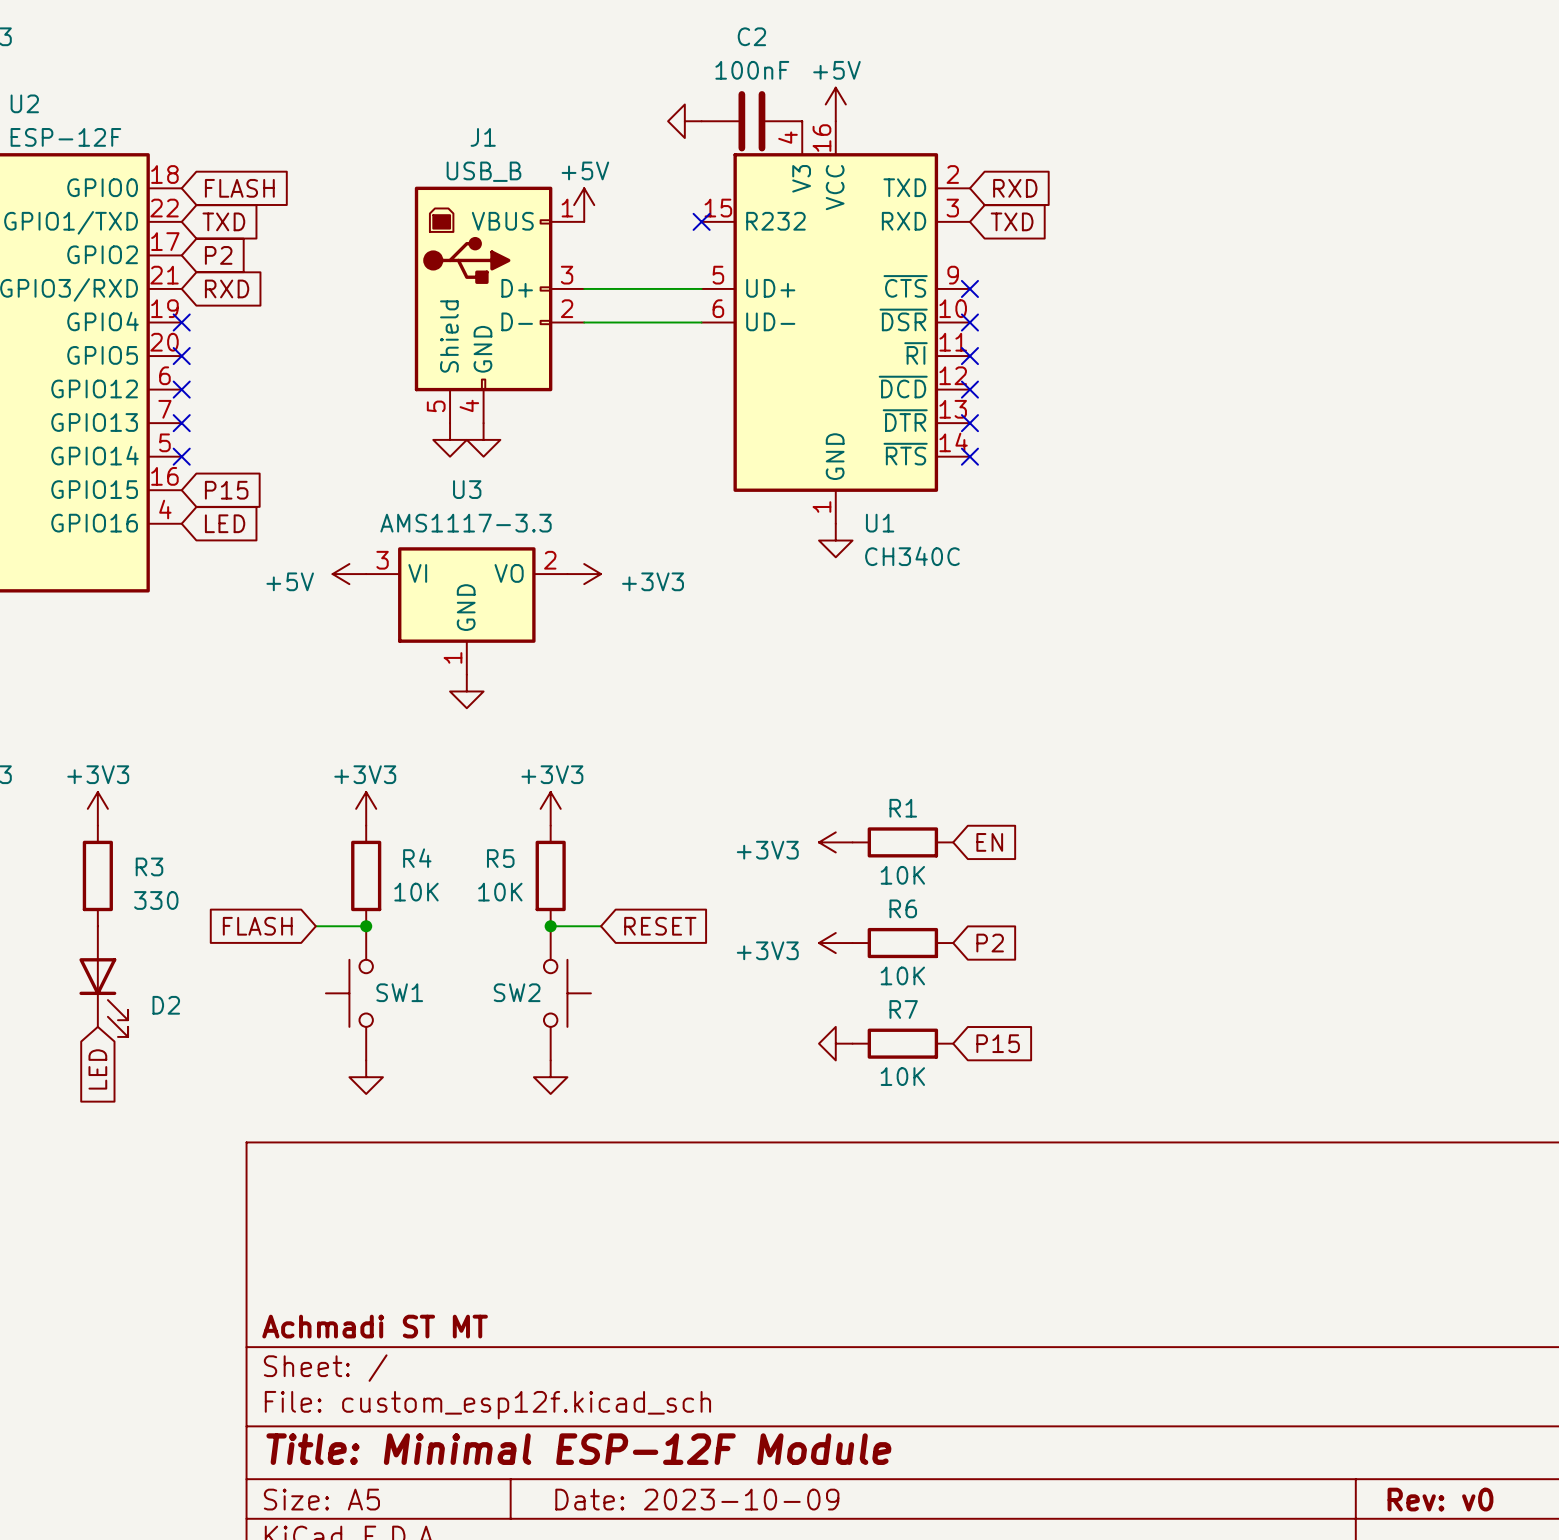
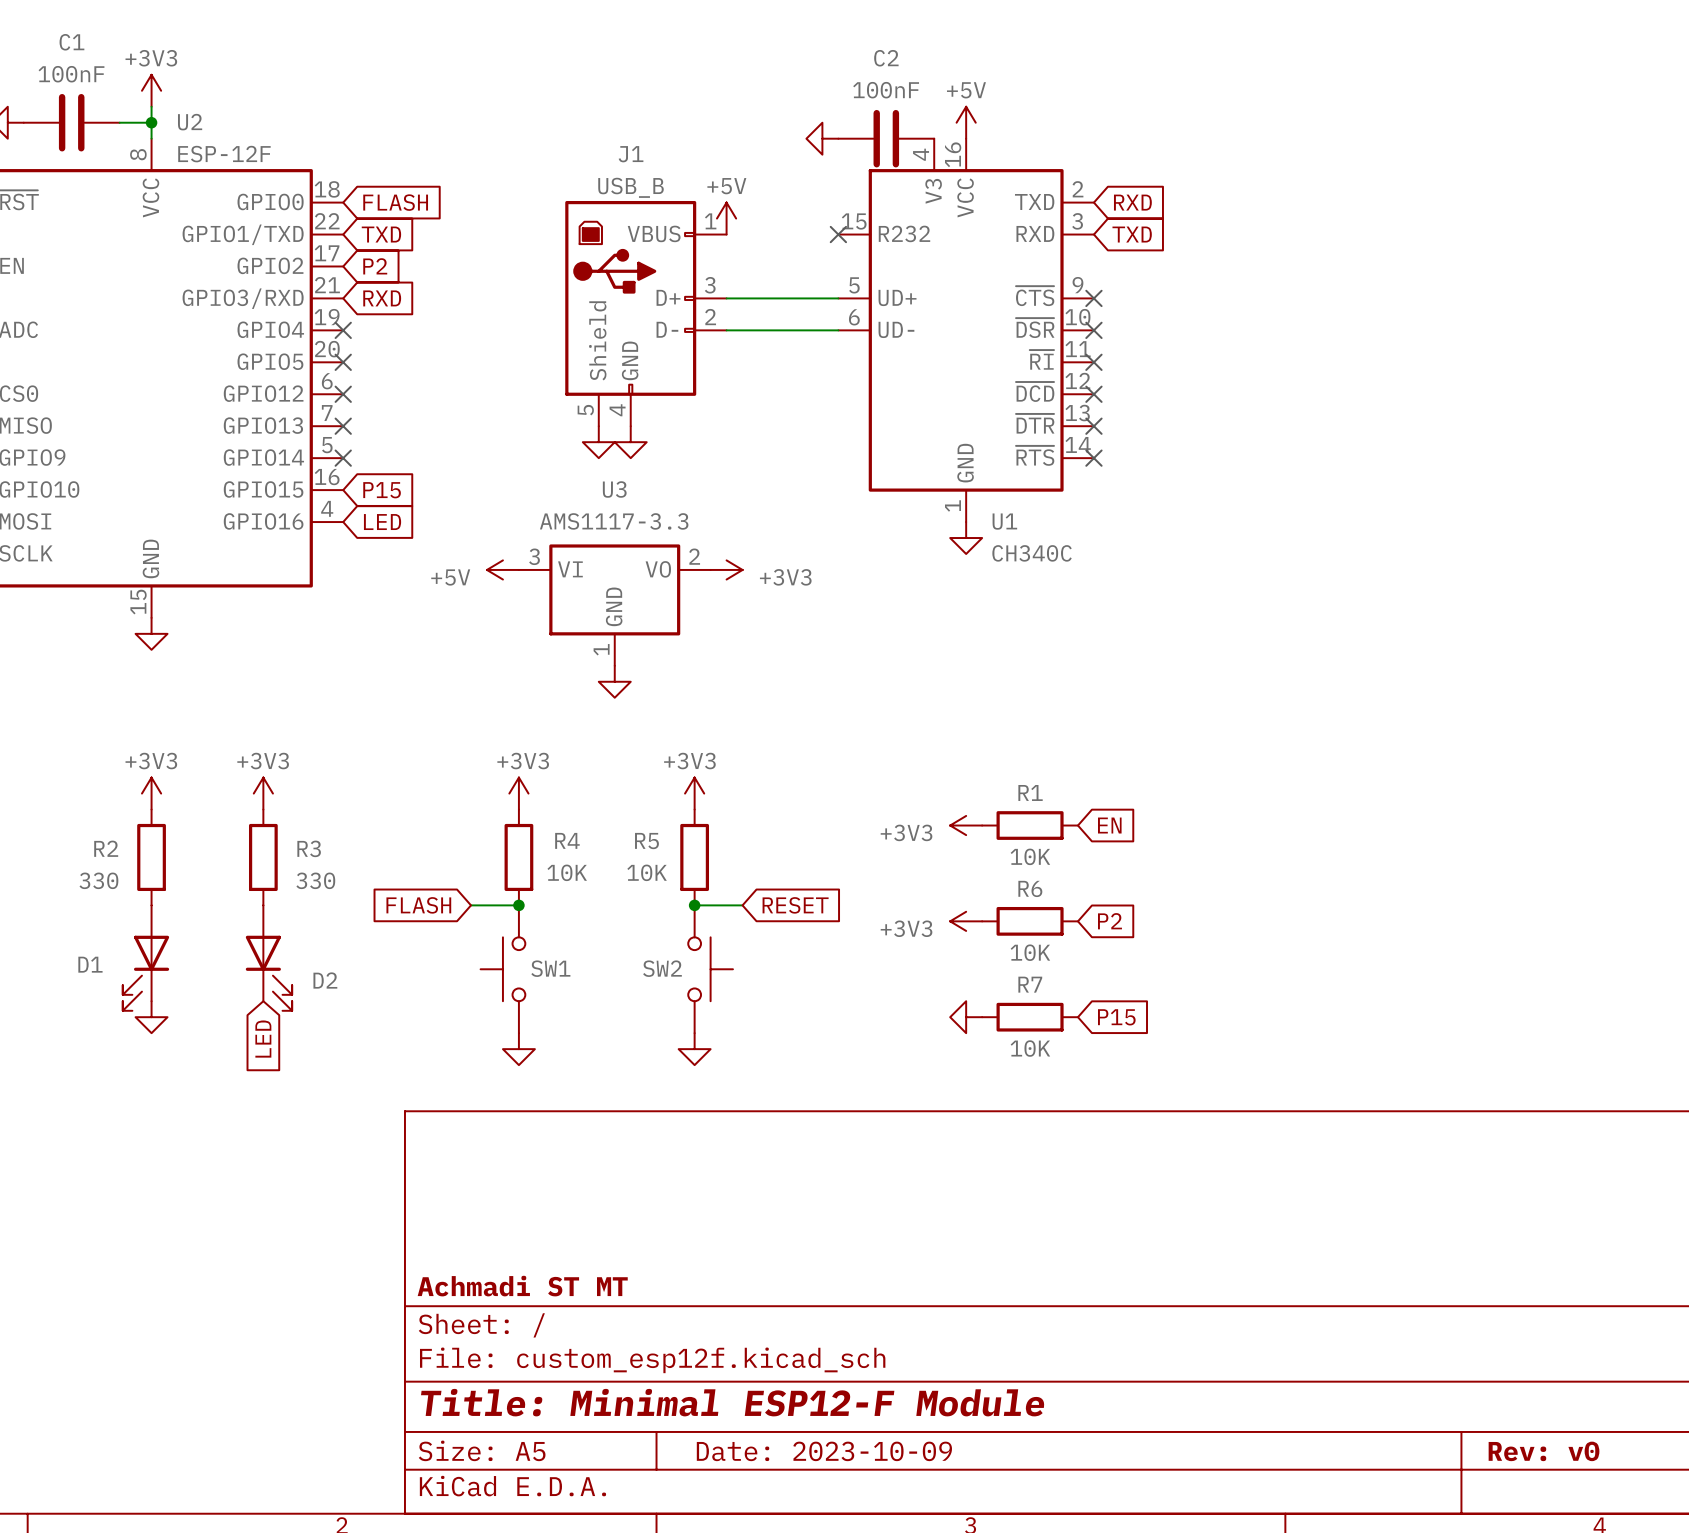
title block: Title: Minimal ESP-12F Module (578, 1449) -> Title: Minimal ESP12-F Module (732, 1402)

